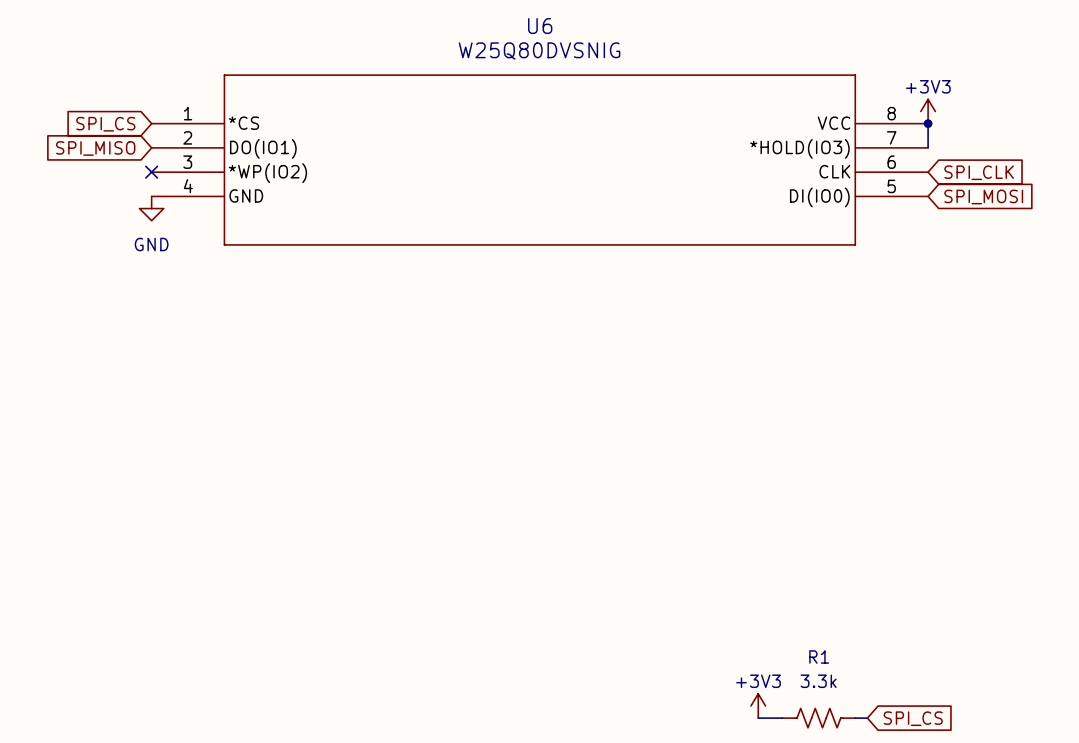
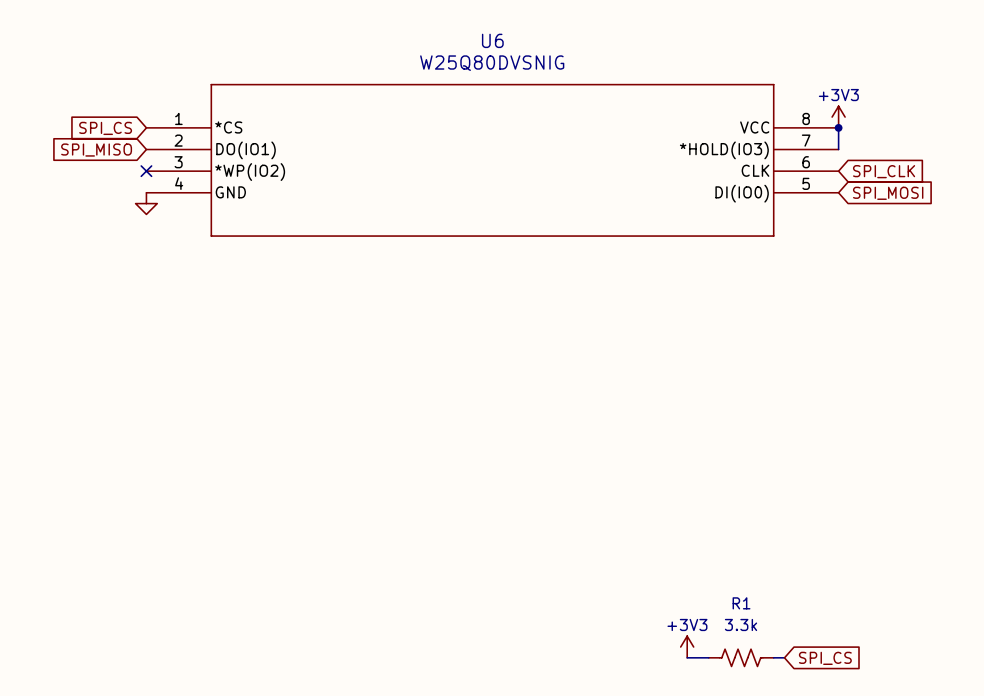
power symbol text: GND (151, 244) -> none

